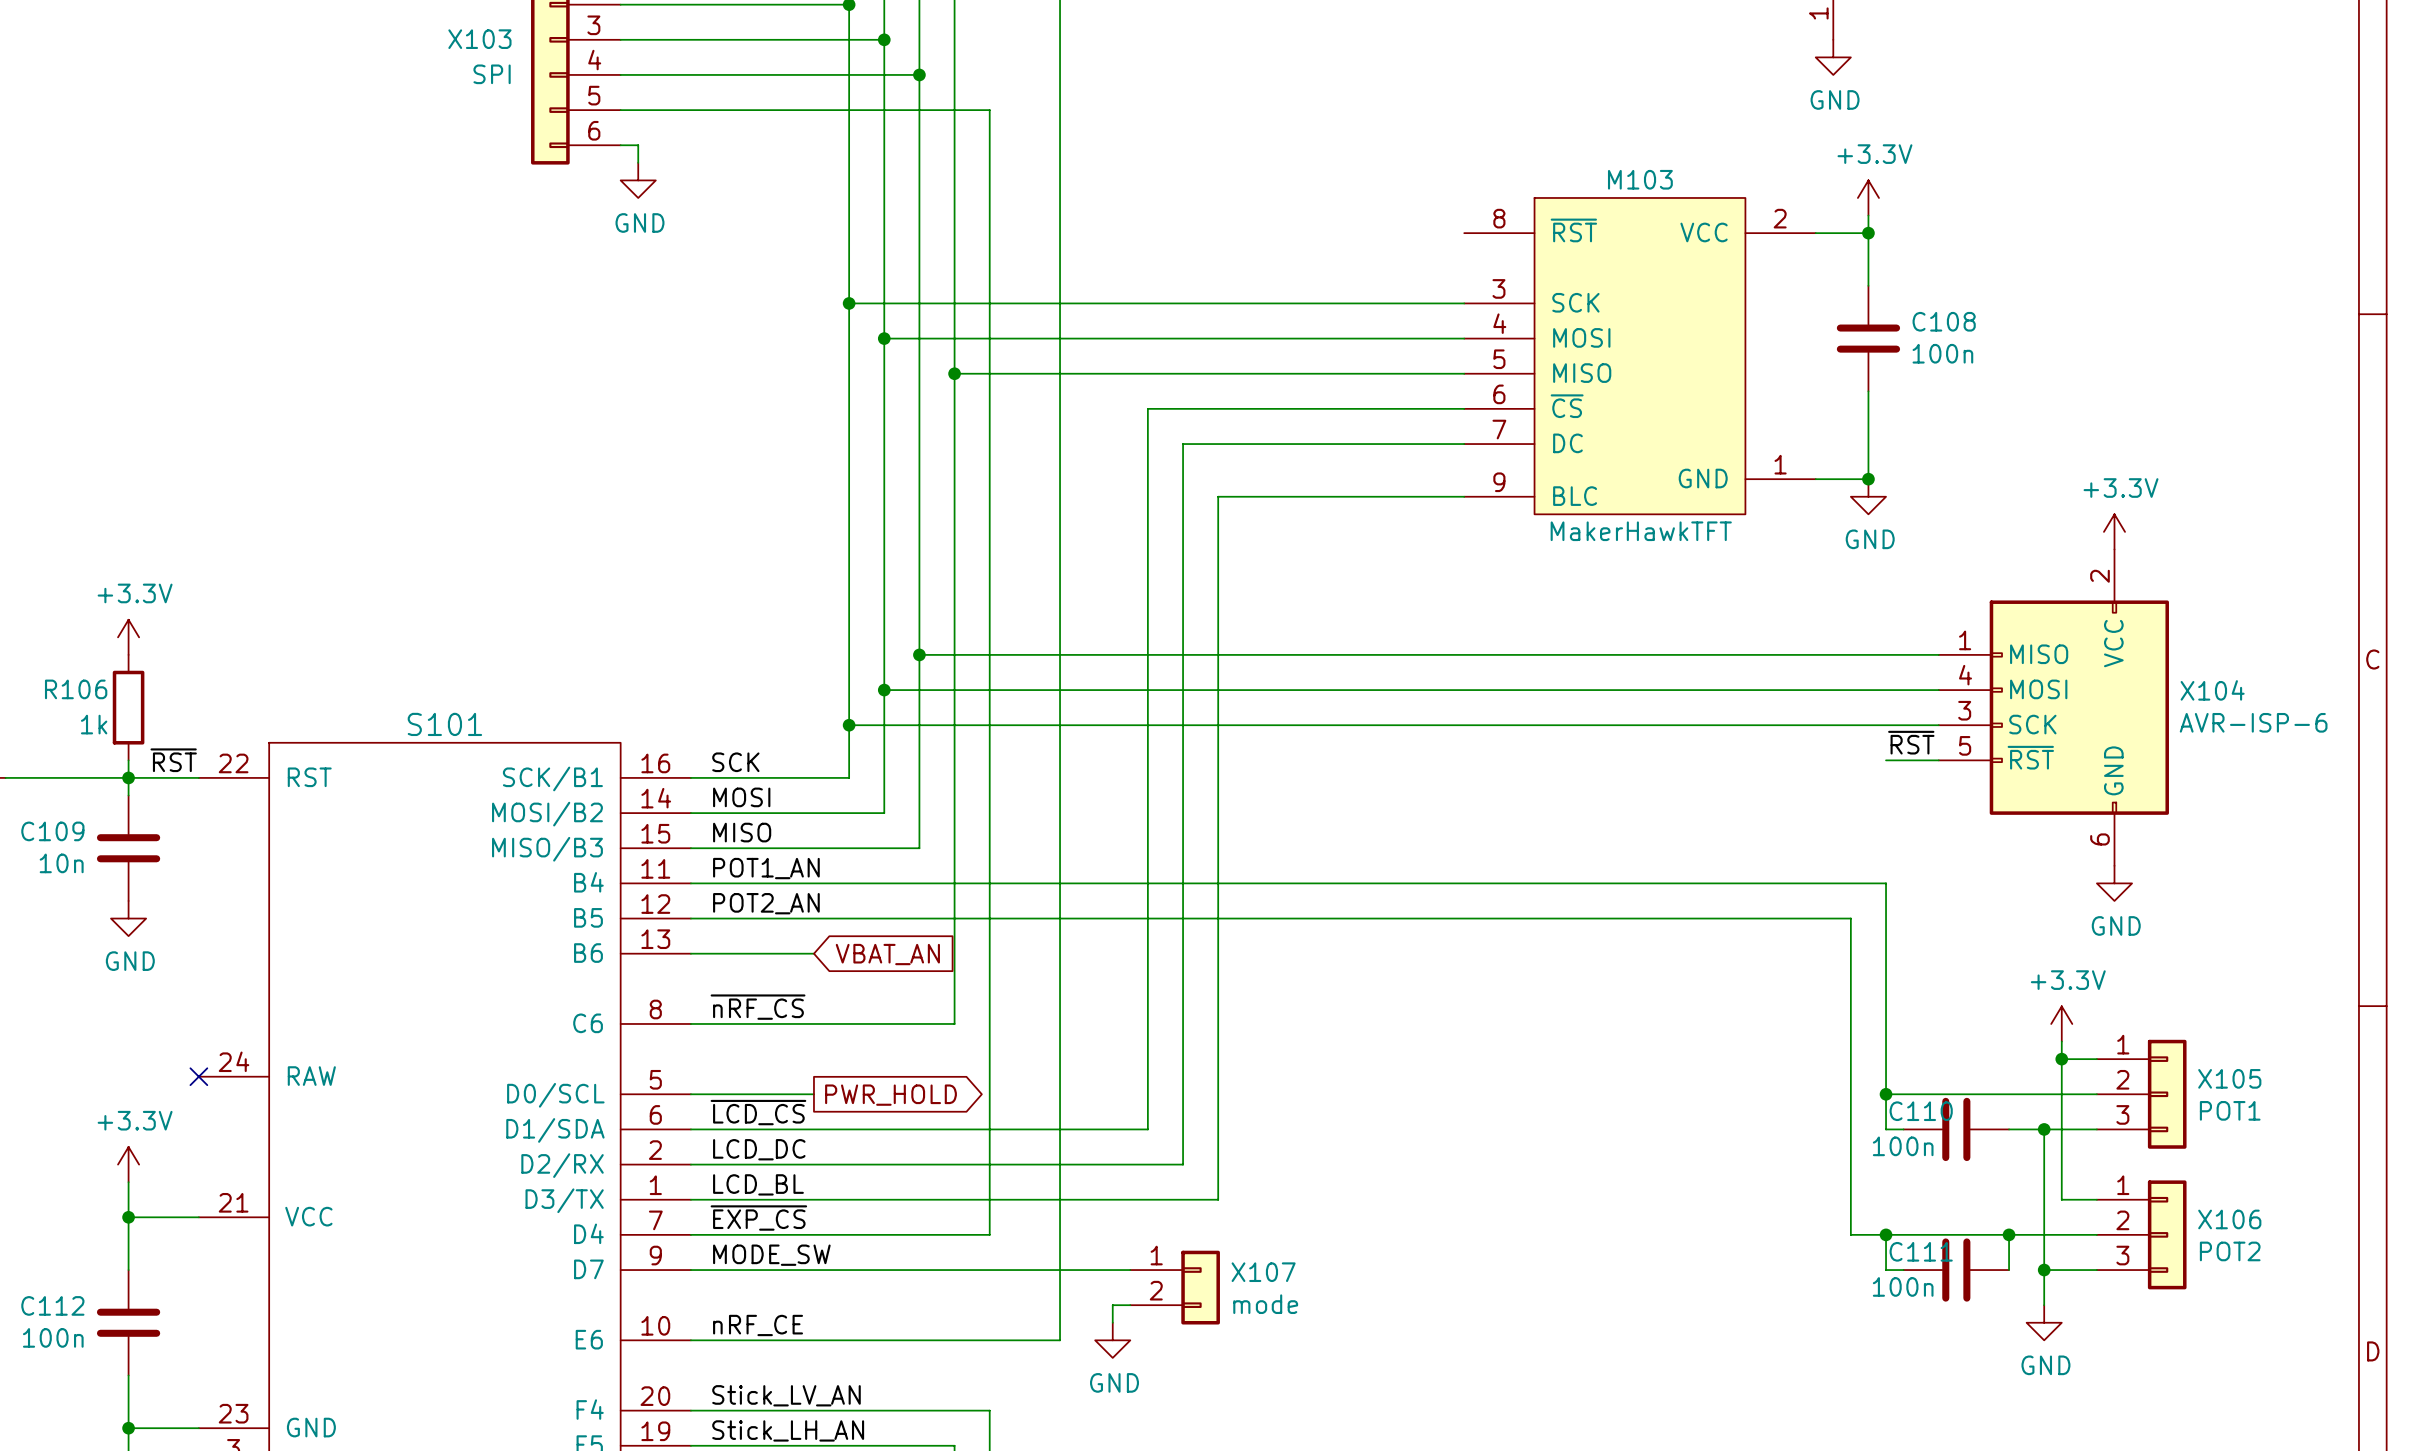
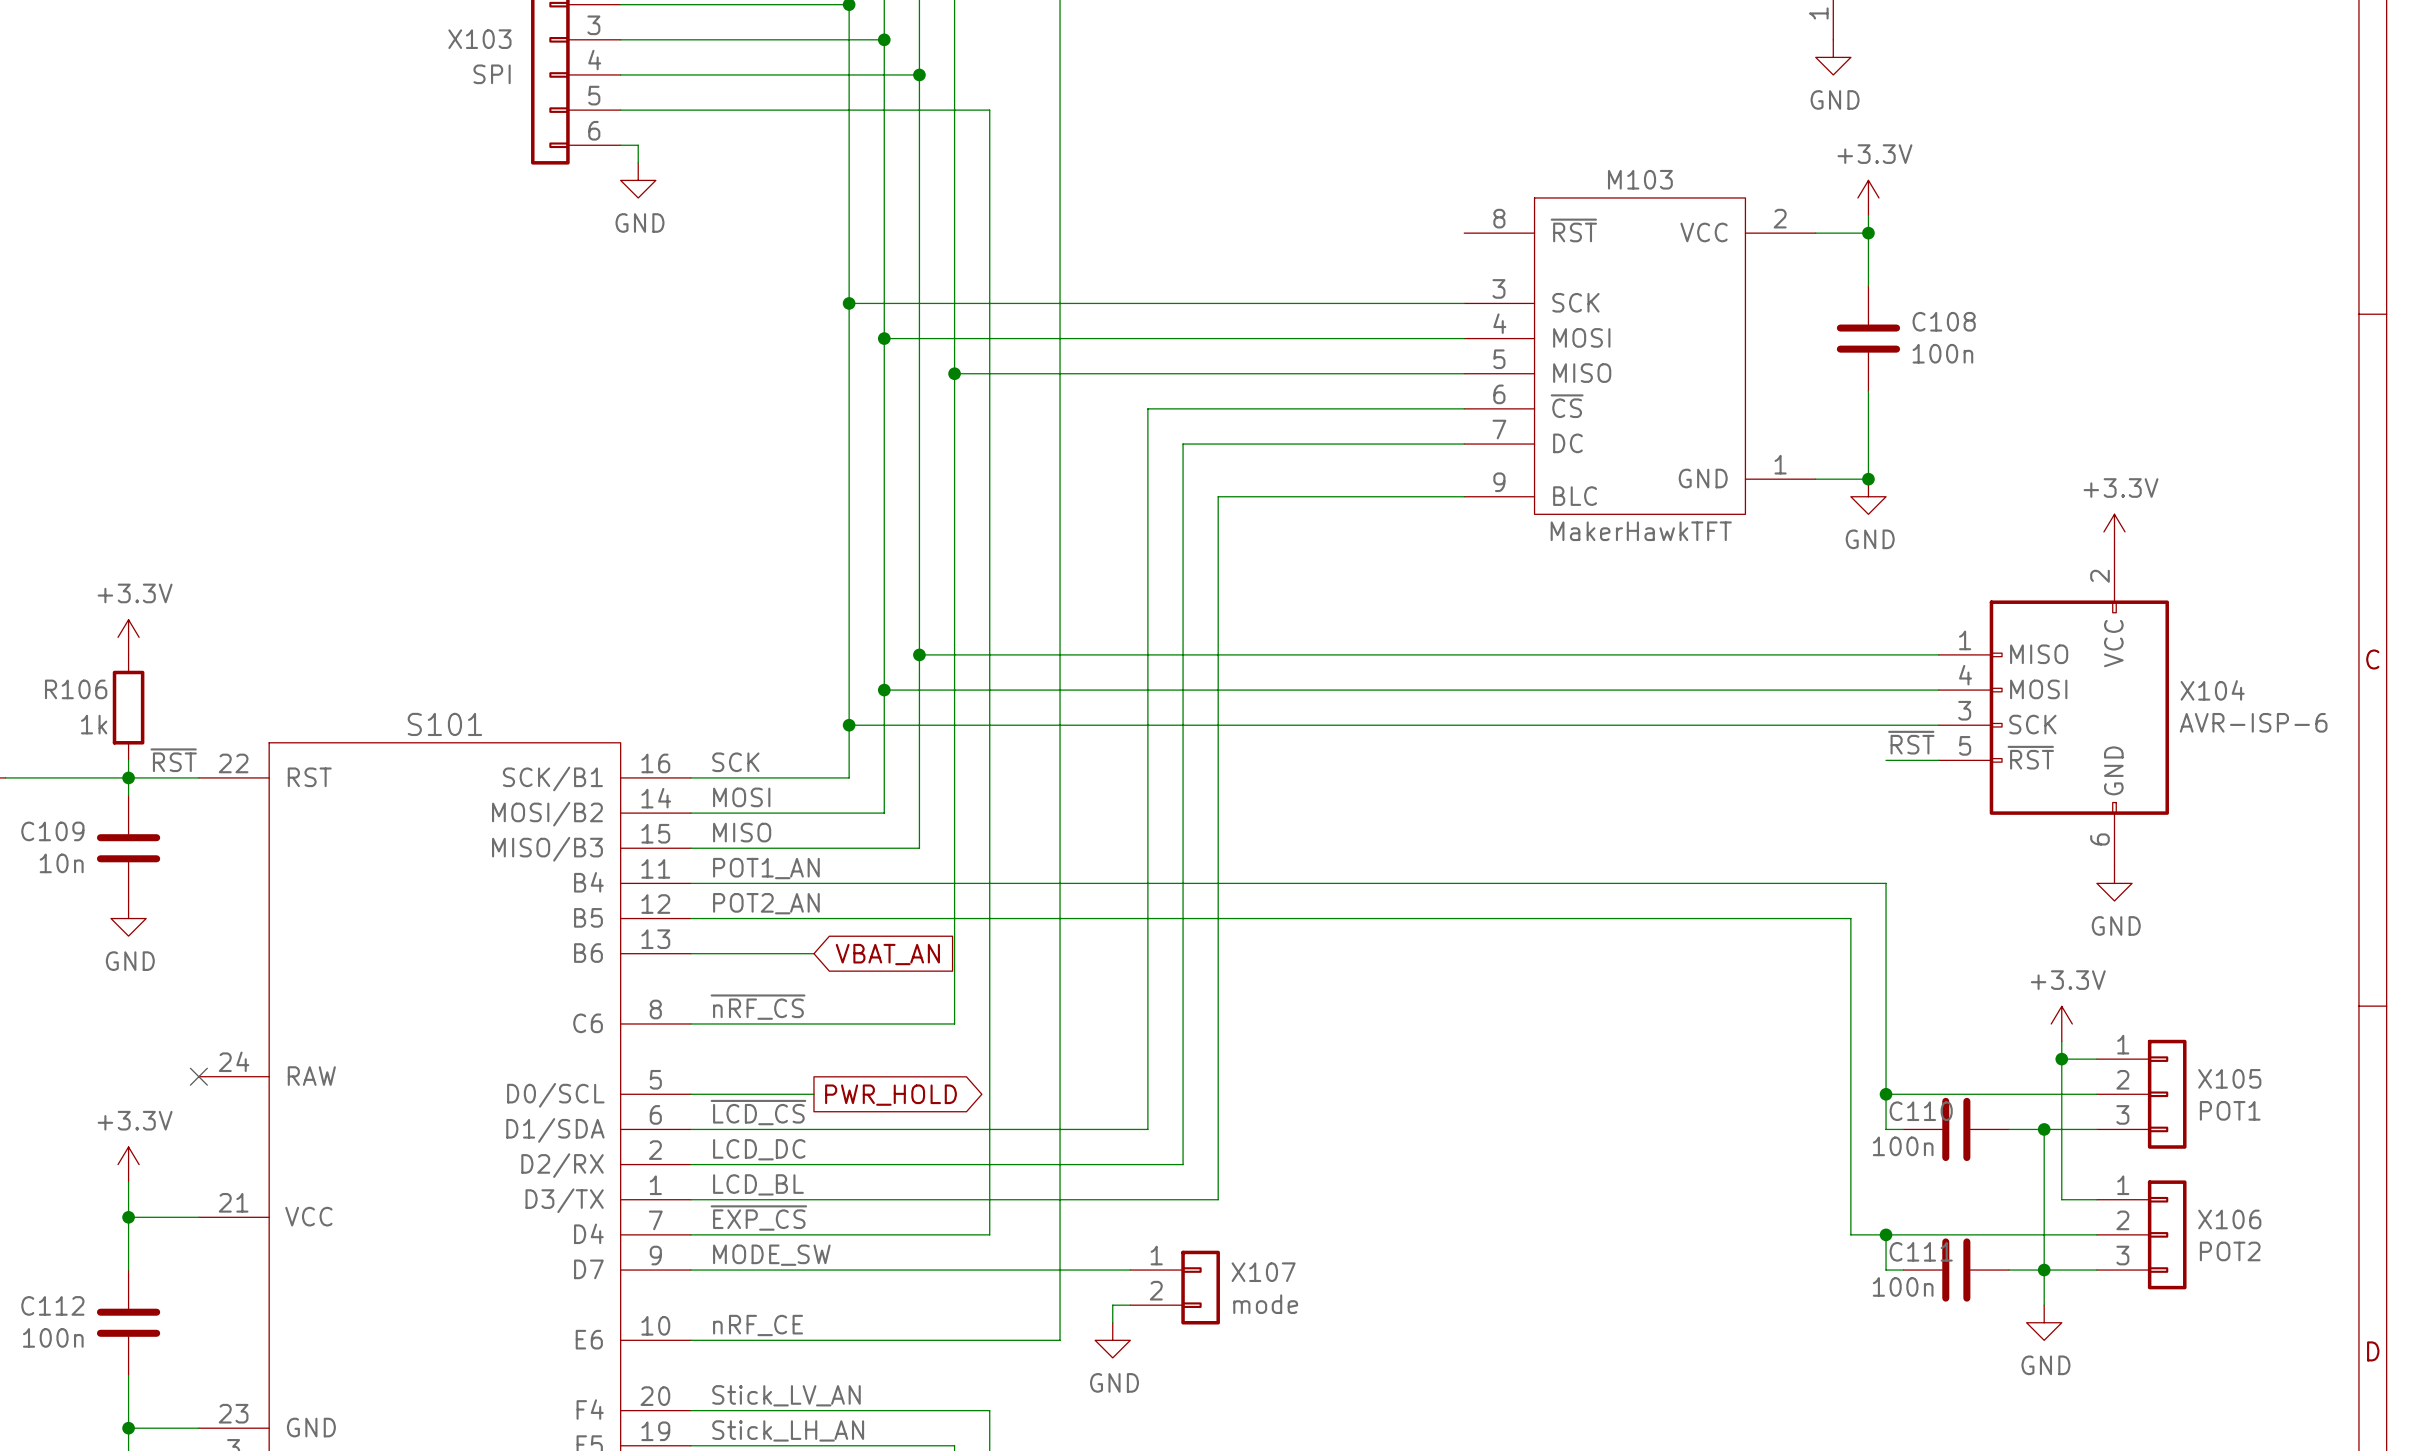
wire: (2009, 1234) (2009, 1270) -> (2044, 1270) (2009, 1270)
junction: (2009, 1234) -> none

